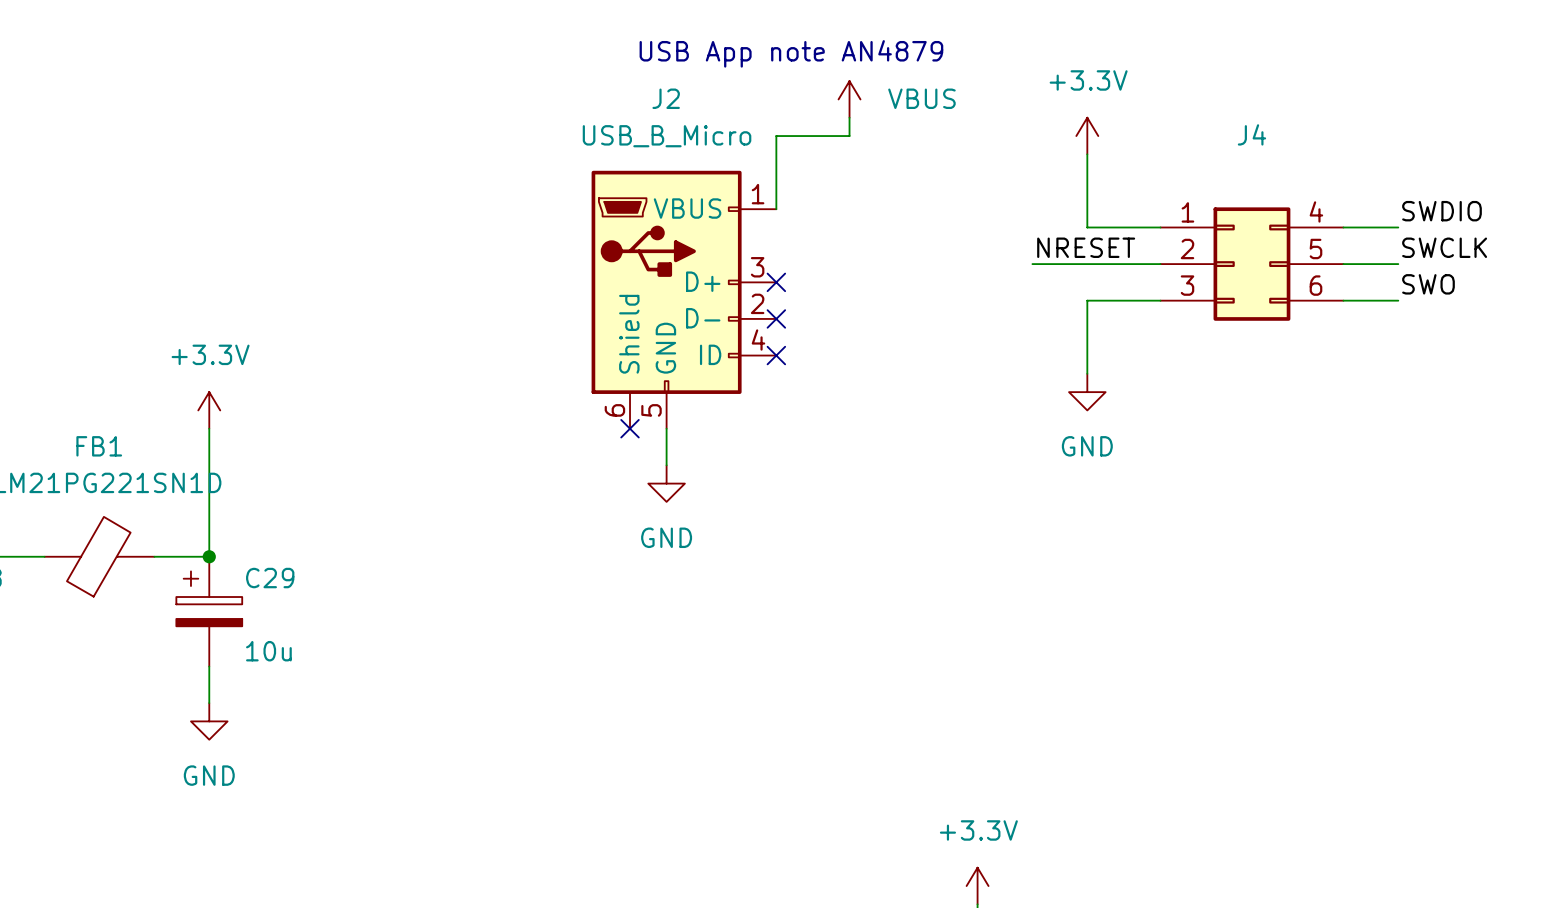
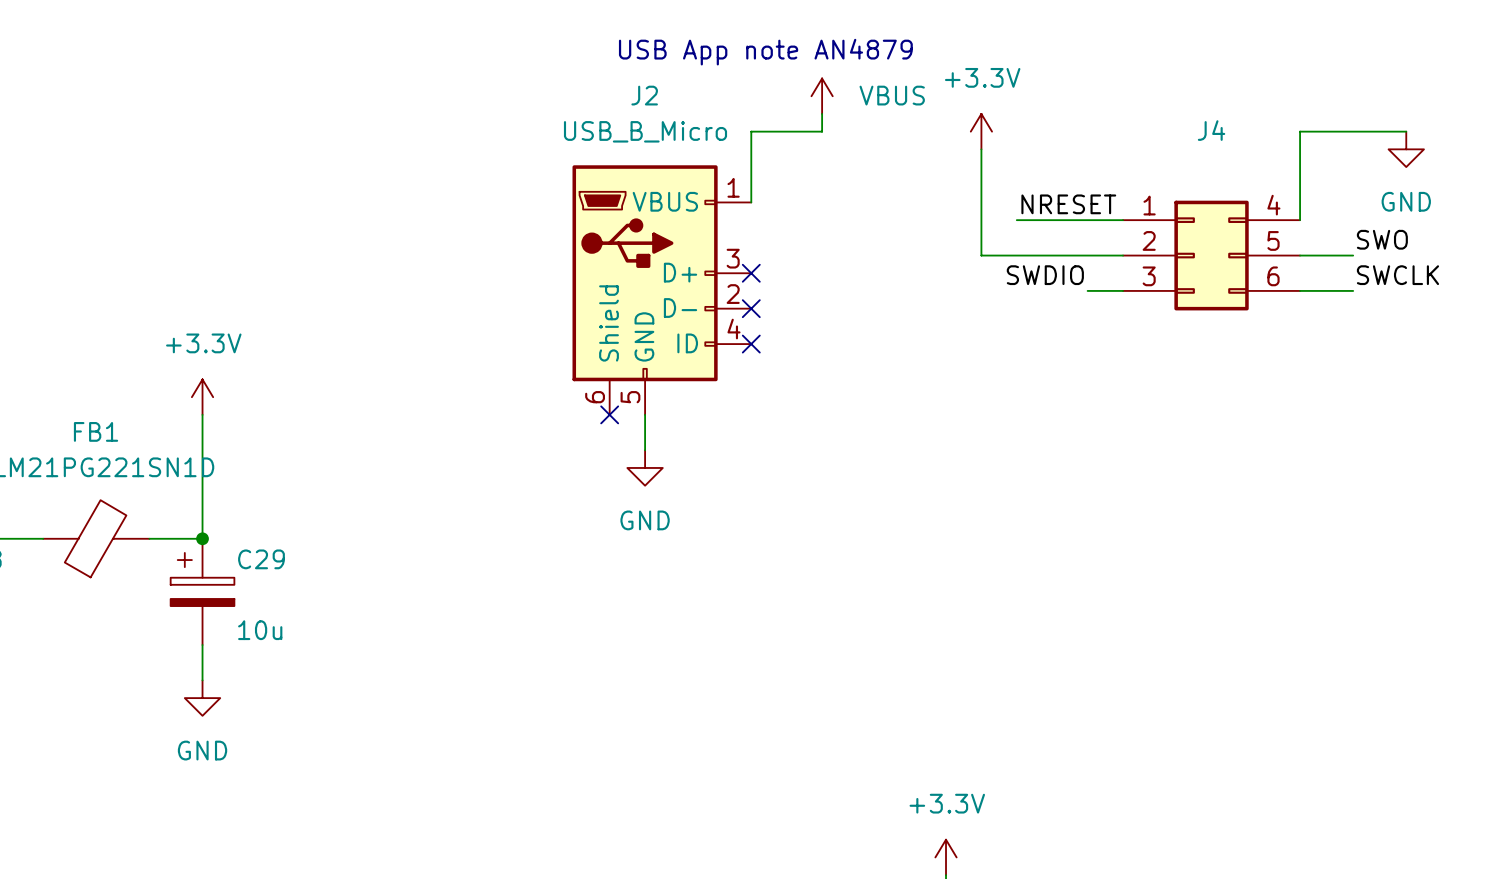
power symbol position: +3.3V (1087, 136) -> +3.3V (981, 131)
wire: none -> (981, 149) (981, 255) (999, 255)
wire: (1087, 154) (1087, 227) -> (1016, 220) (1052, 220)
power symbol: none -> GND (1406, 149)
label position: SWDIO (1441, 211) -> SWDIO (1045, 275)
wire: (1343, 227) (1398, 227) -> (1300, 220) (1300, 131) (1406, 131)
label position: NRESET (1086, 247) -> NRESET (1068, 204)
label: SWCLK (1444, 247) -> SWO (1382, 239)
label: SWO (1428, 284) -> SWCLK (1397, 275)
wire: (1123, 300) (1087, 300) (1087, 373) -> none
power symbol: GND (1087, 392) -> none

